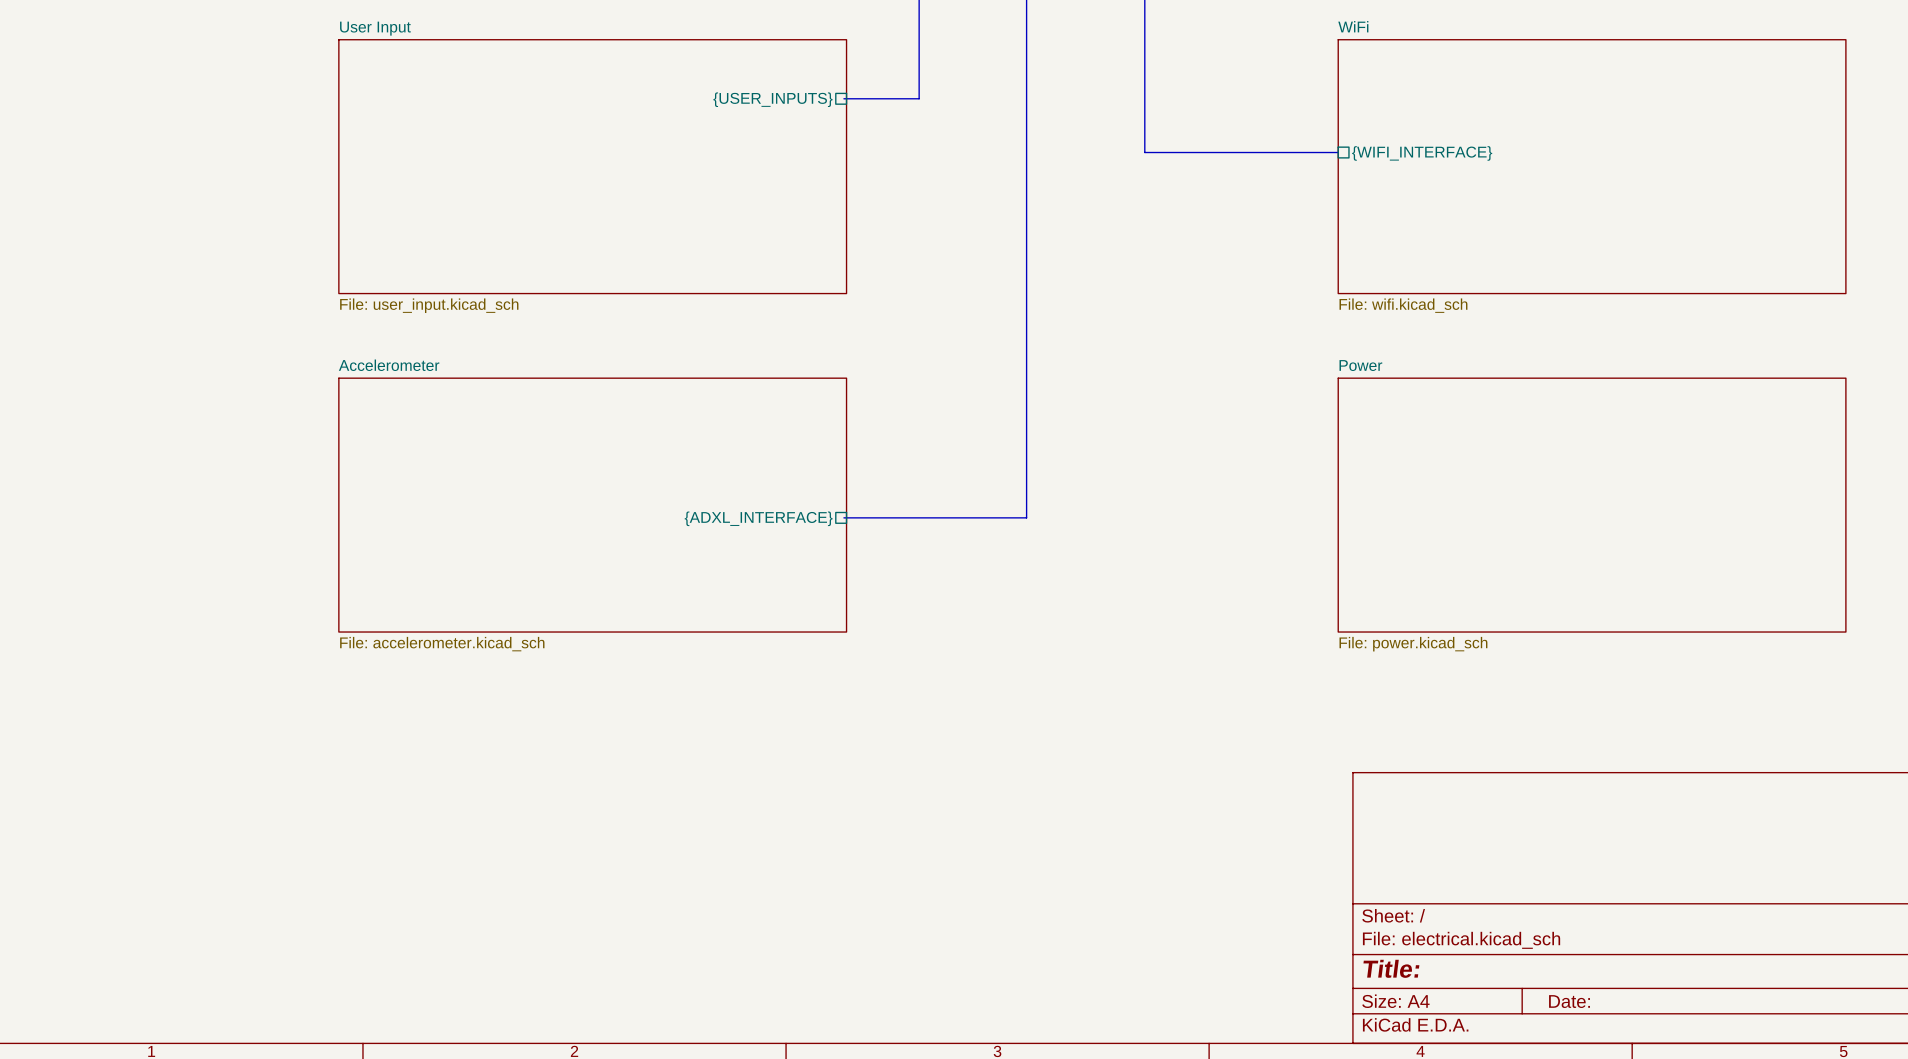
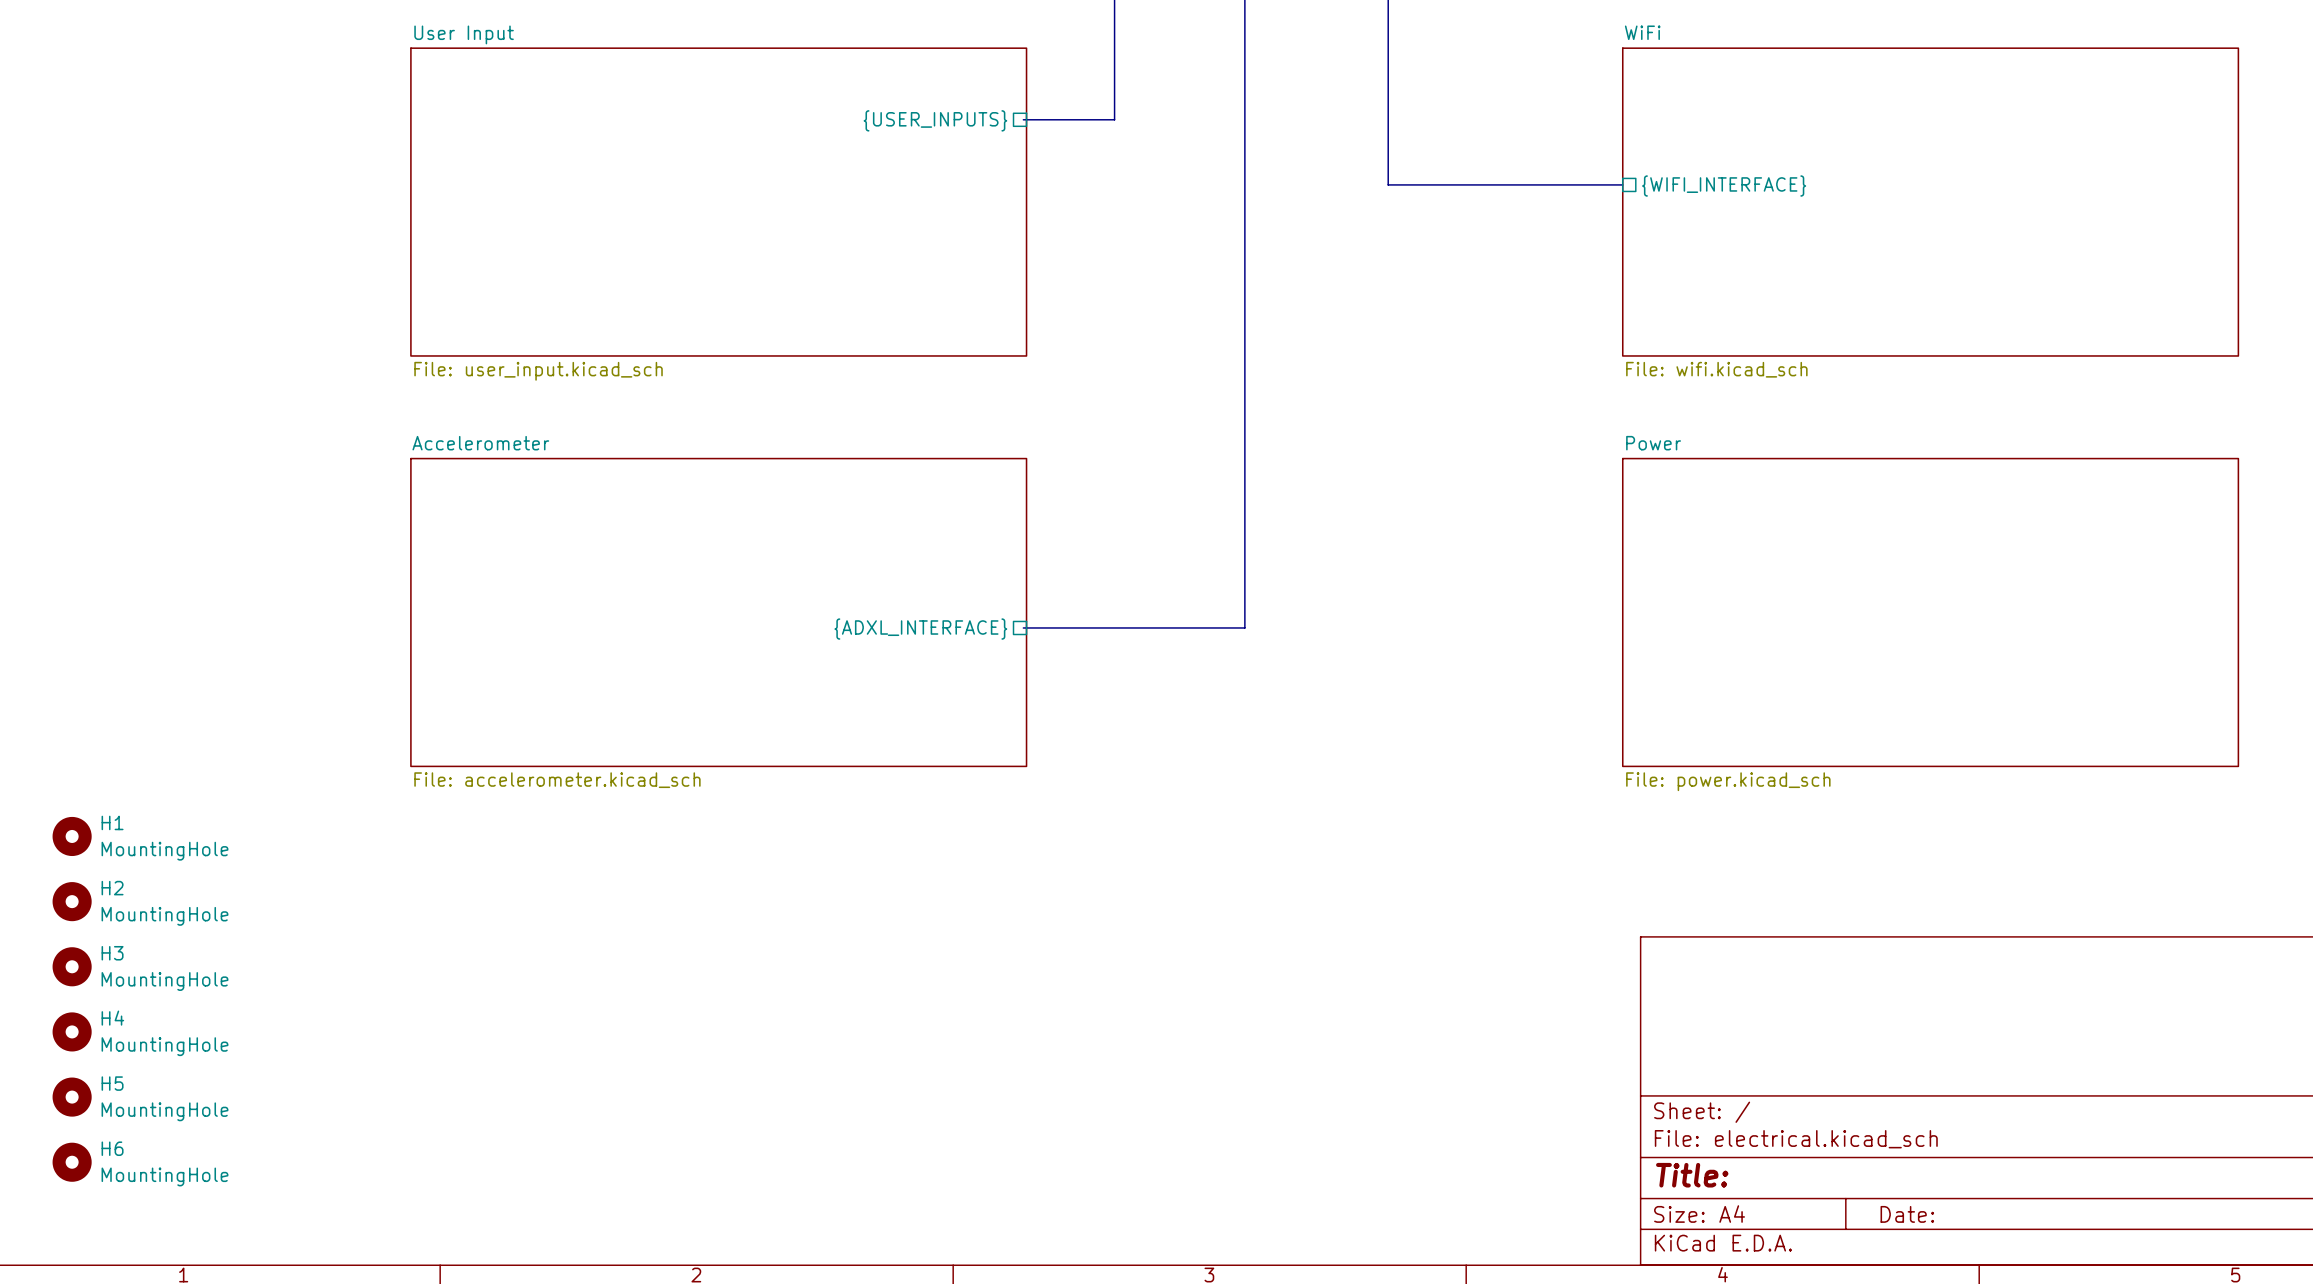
H1: none -> MountingHole (72, 836)
H2: none -> MountingHole (72, 901)
H3: none -> MountingHole (72, 966)
H4: none -> MountingHole (72, 1031)
H5: none -> MountingHole (72, 1097)
H6: none -> MountingHole (72, 1162)

